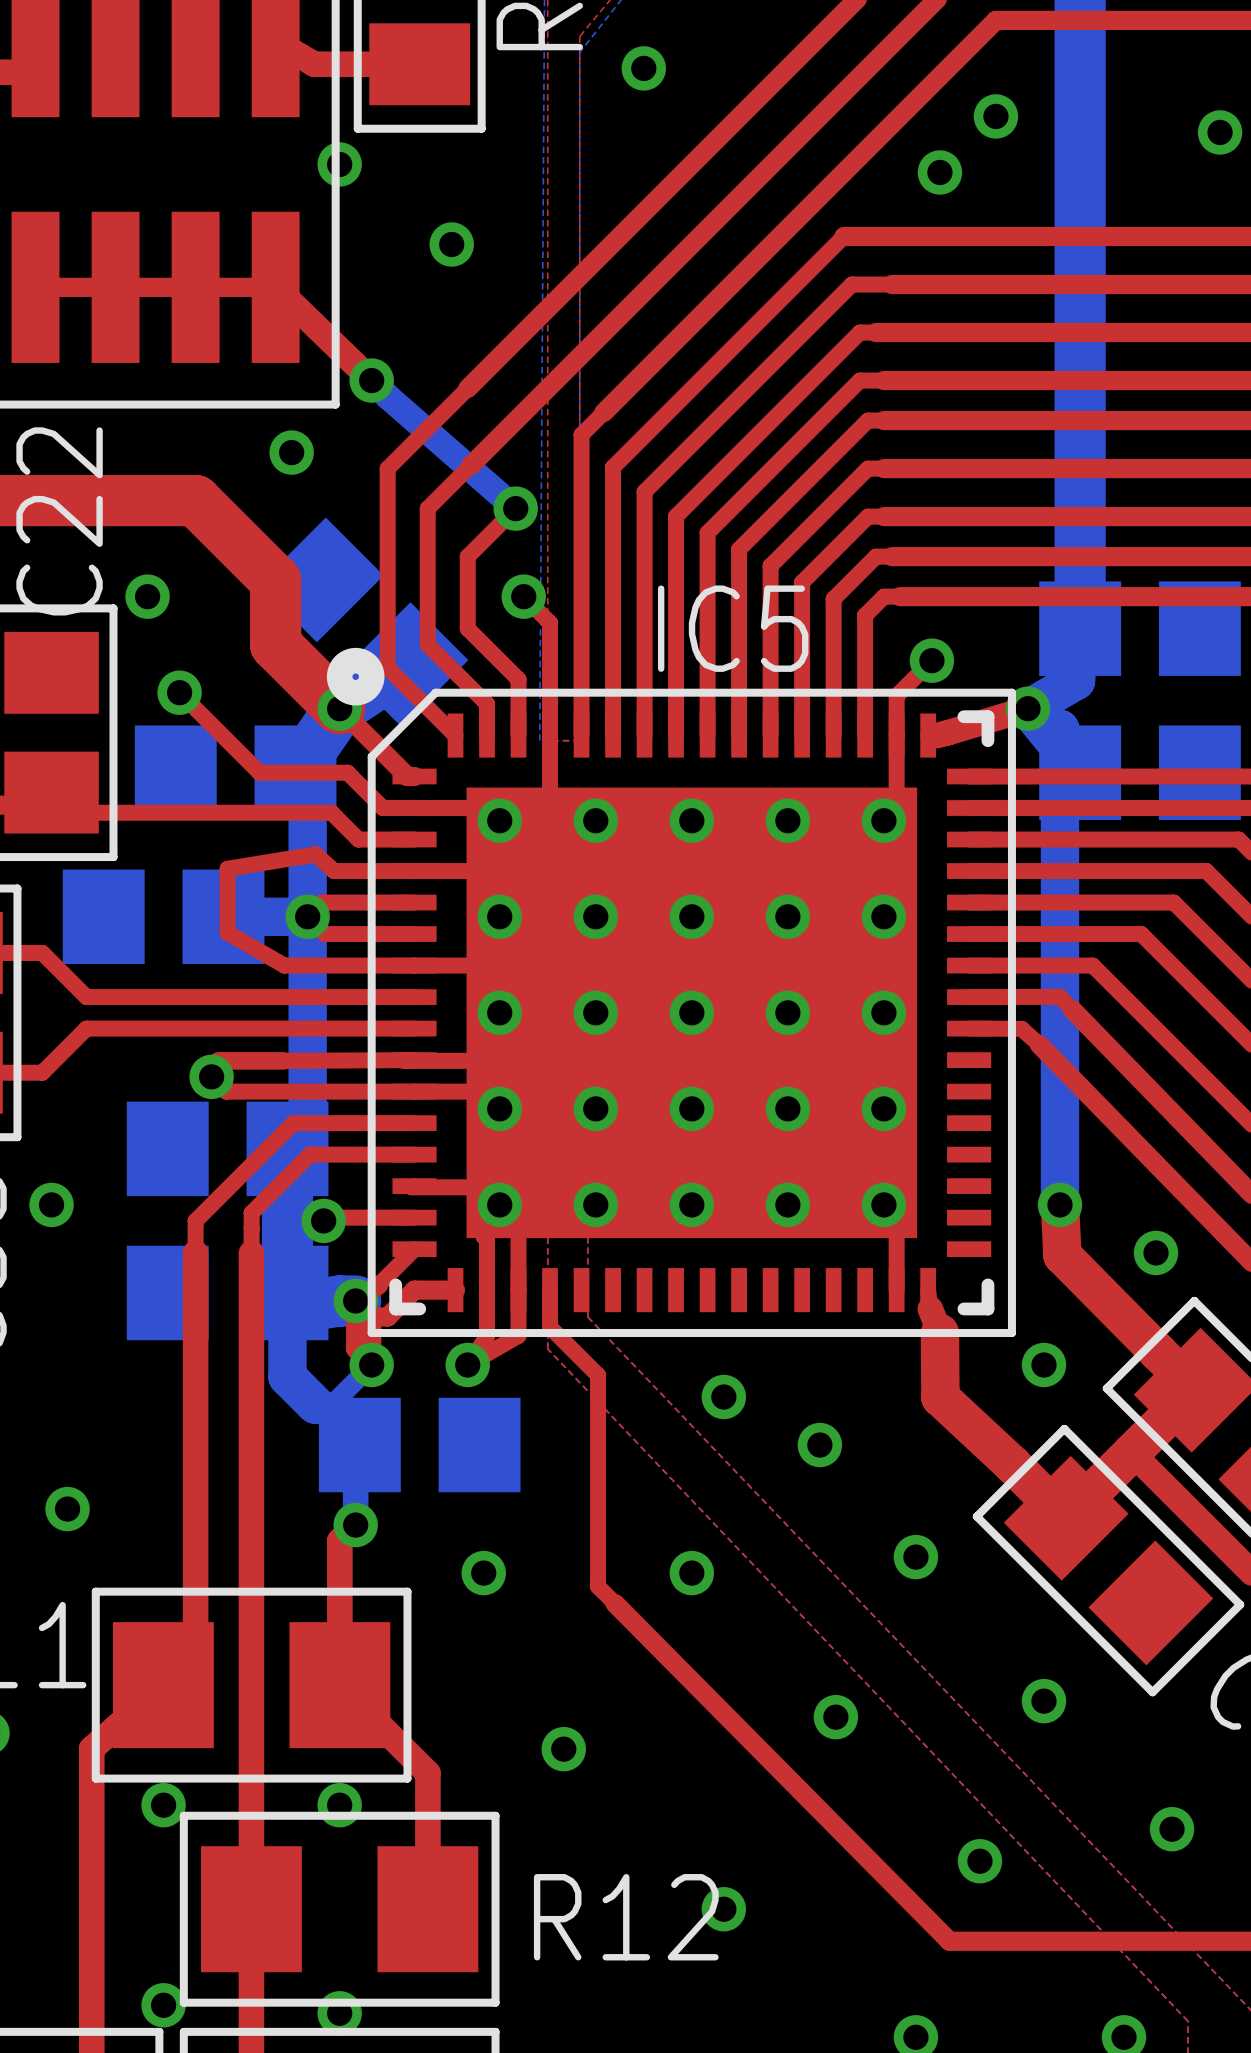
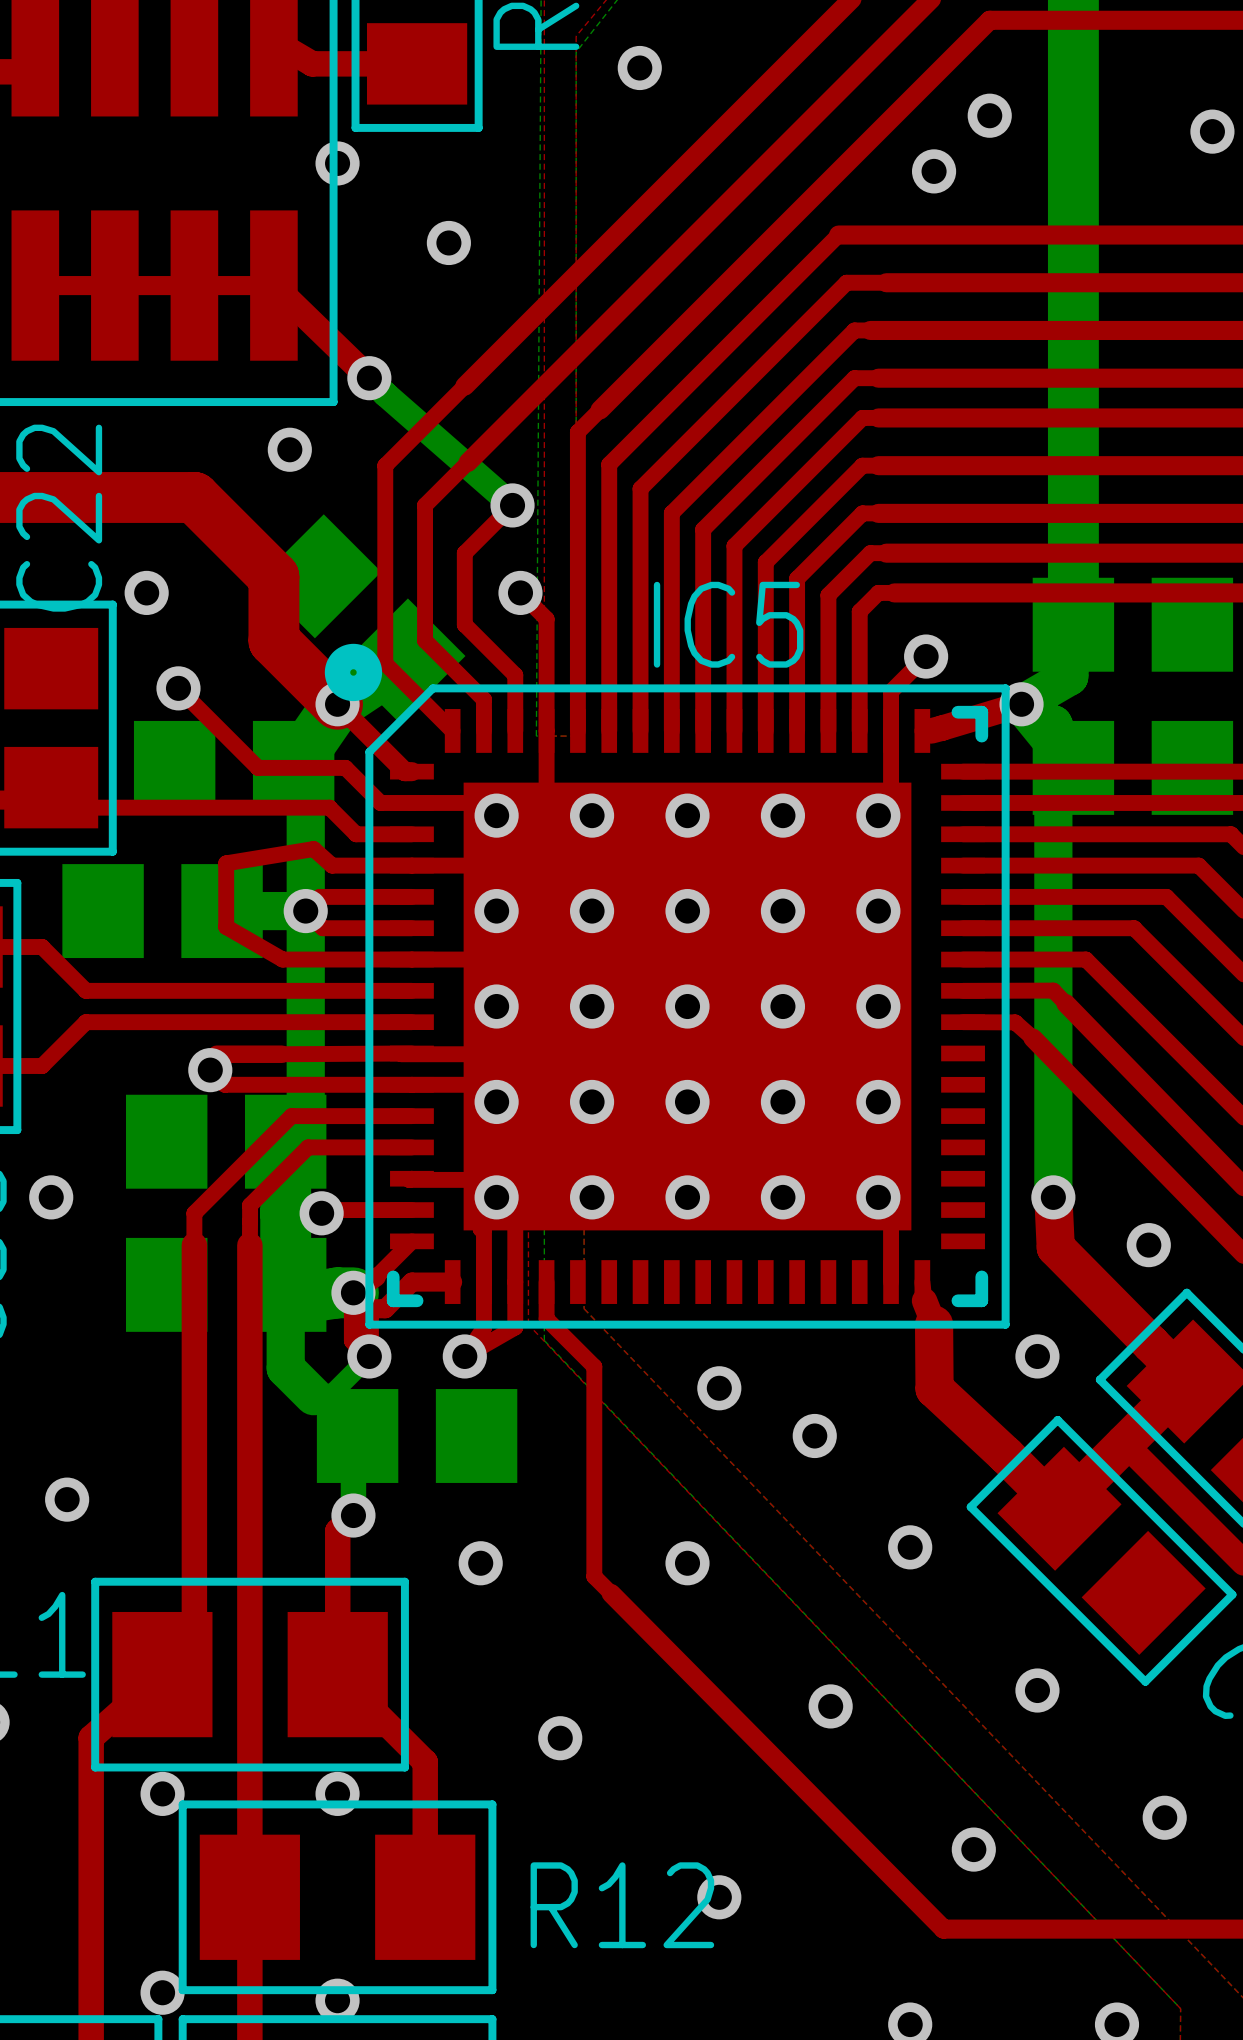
top zone outline: (547, 1236) (547, 1348) (1188, 2021) -> (544, 1229) (528, 1229) (528, 1324) (1180, 2008)

